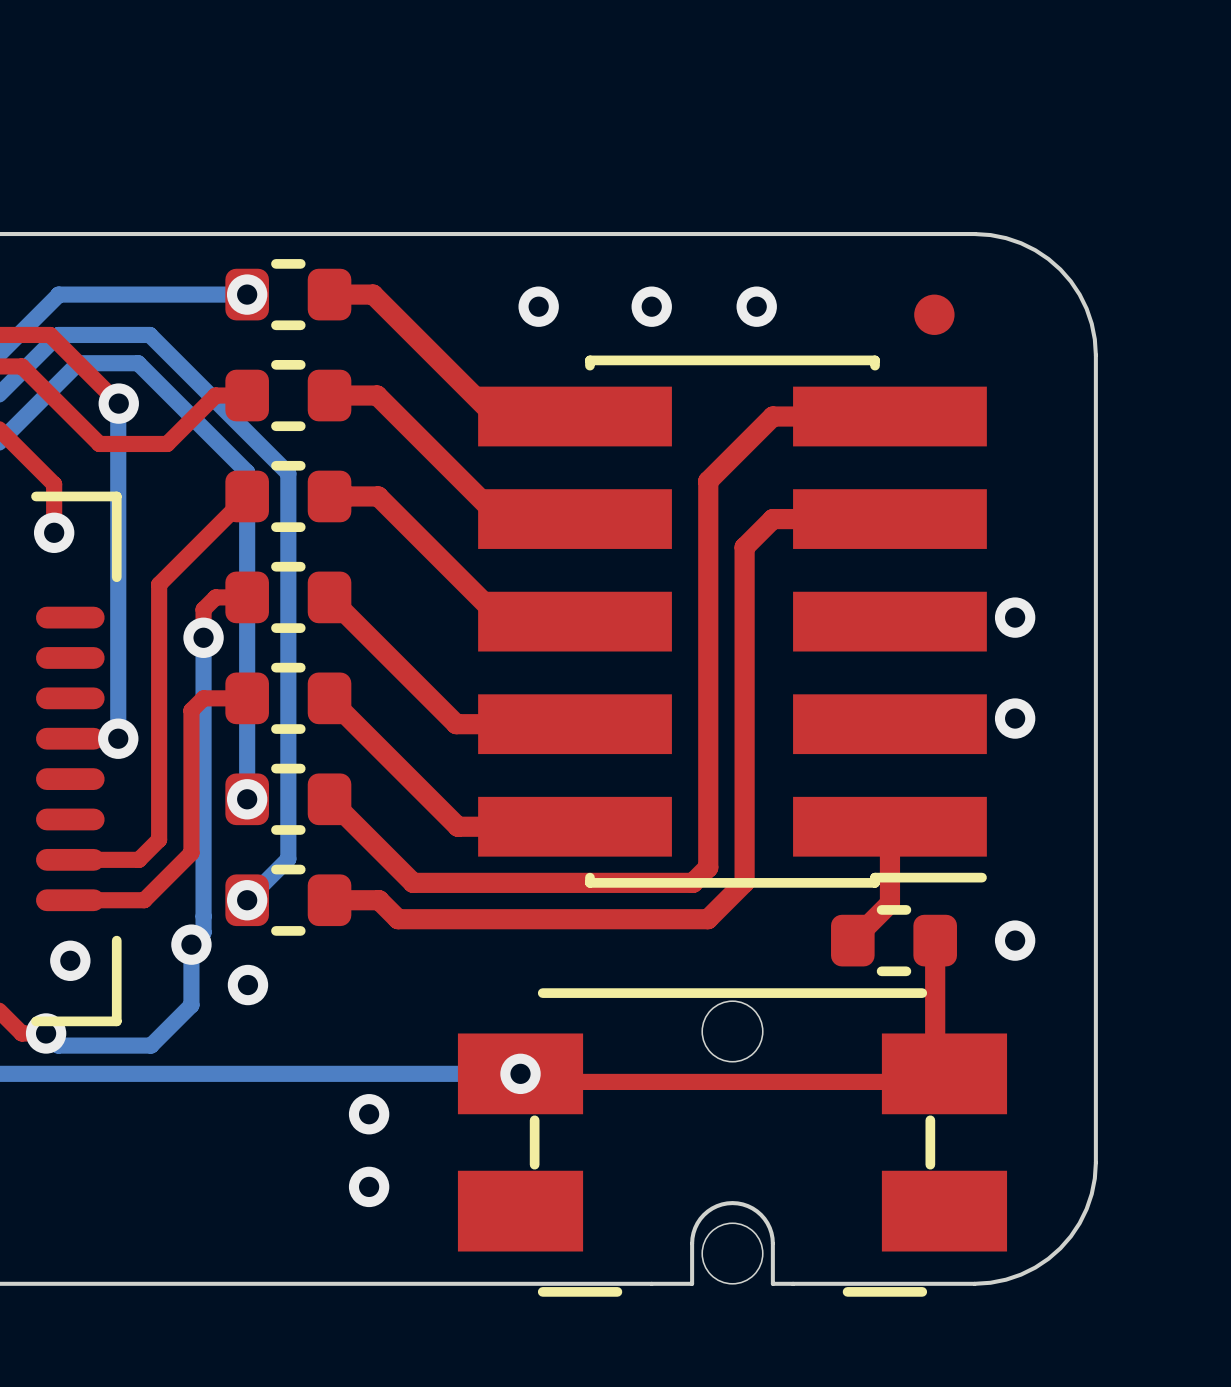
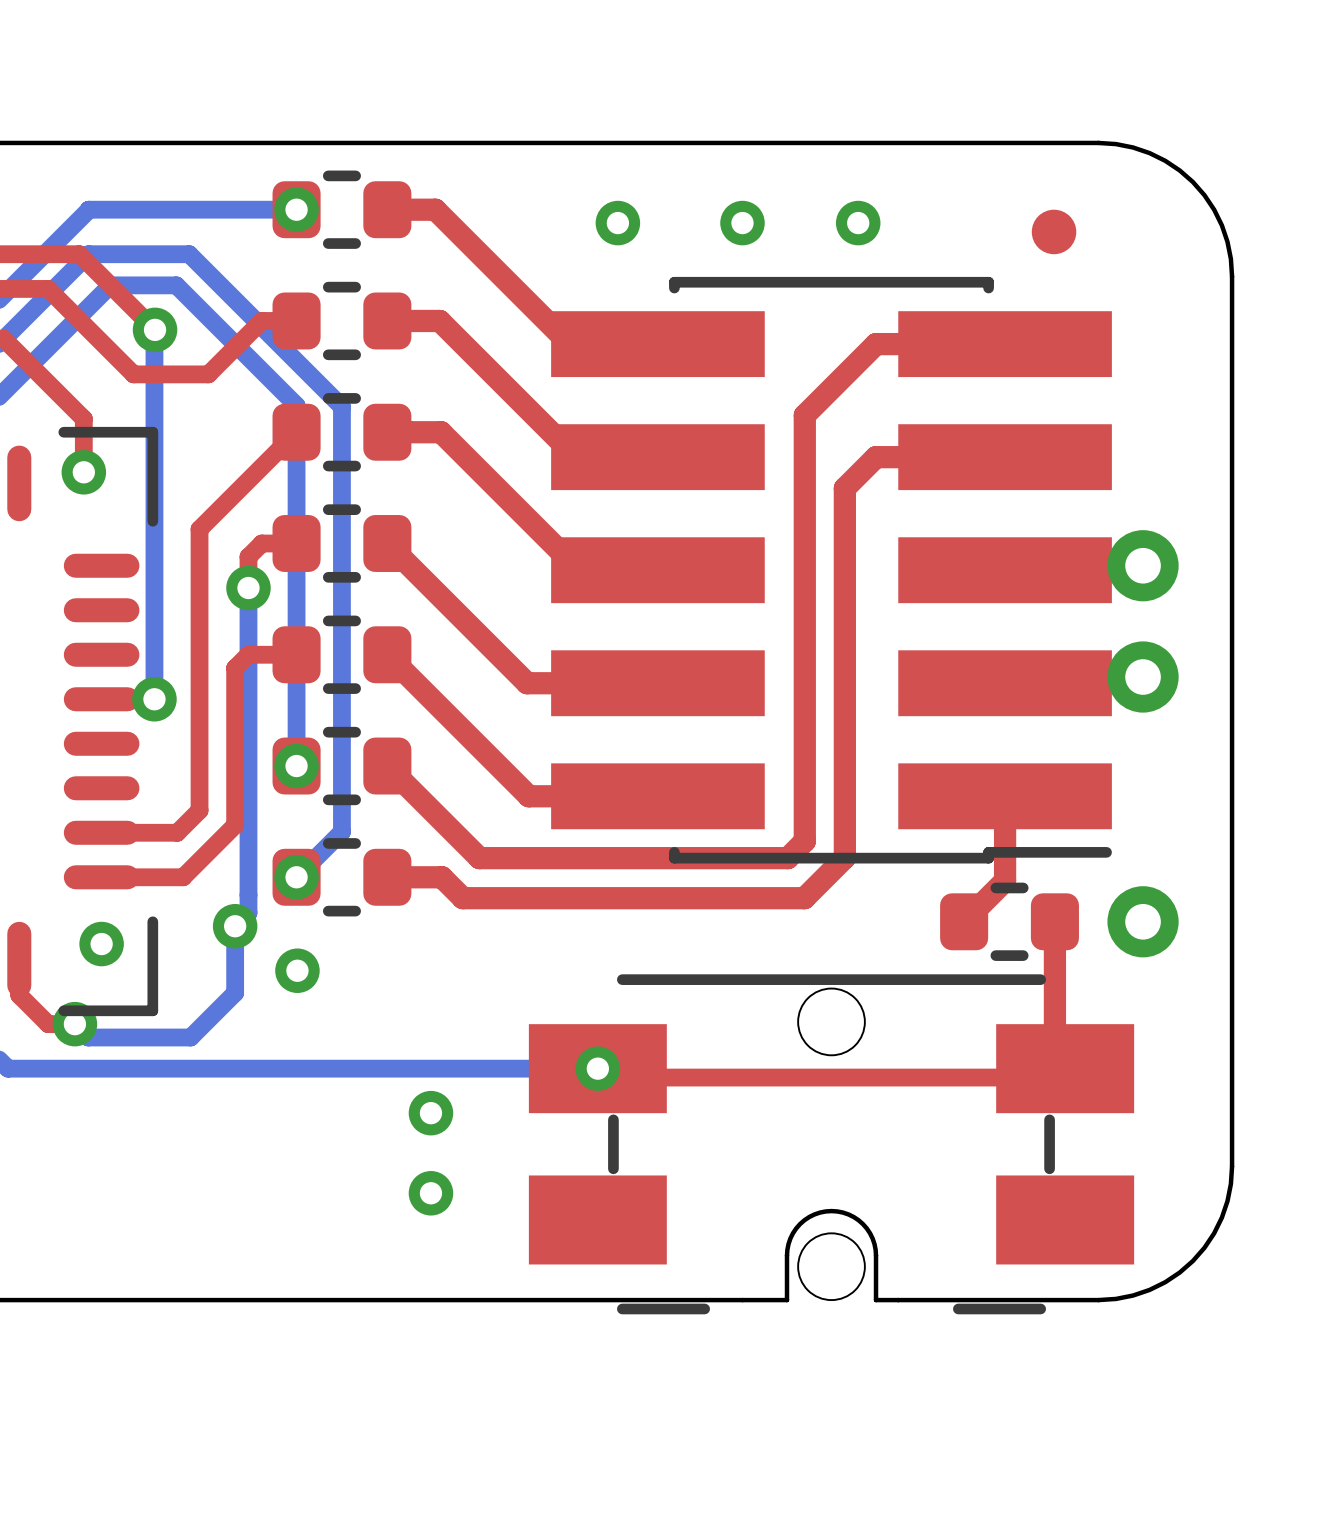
via size: [994, 597, 1036, 638] -> [1107, 530, 1179, 602]
via size: [994, 698, 1036, 739] -> [1107, 641, 1179, 713]
via size: [994, 920, 1036, 961] -> [1107, 886, 1179, 958]

